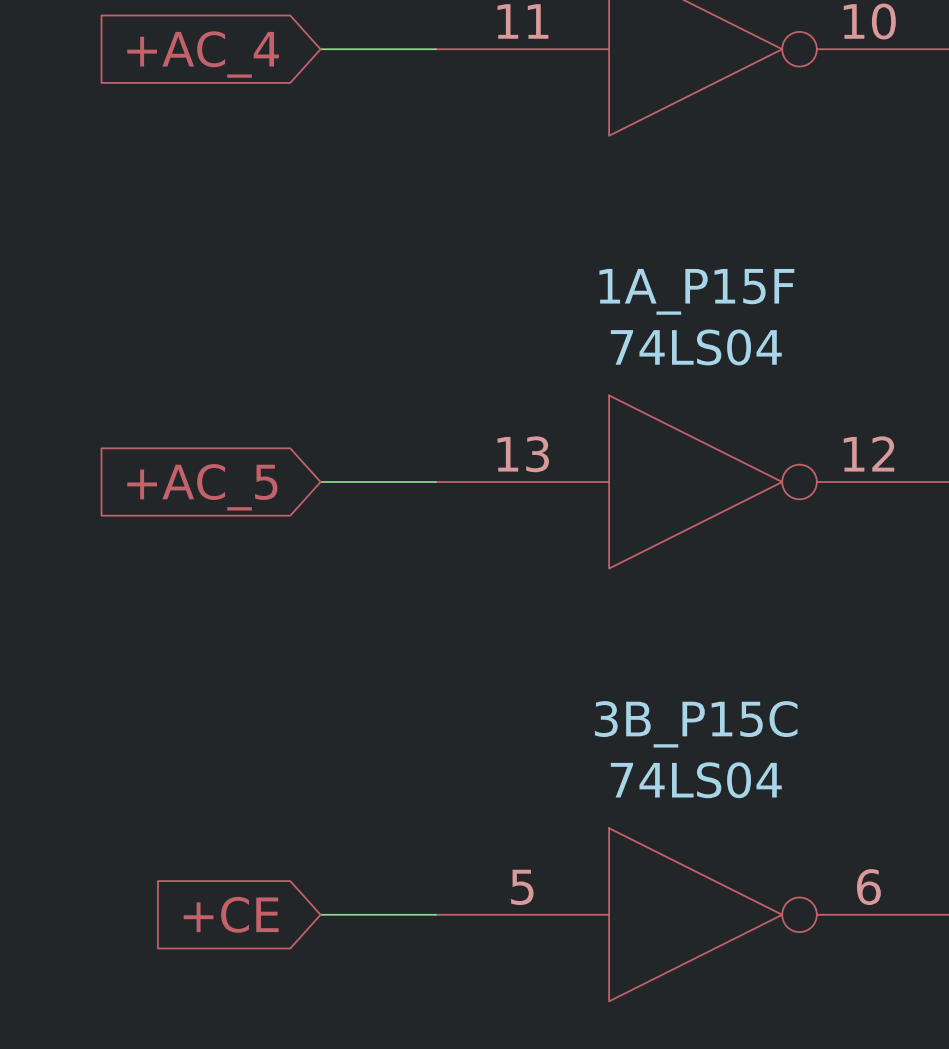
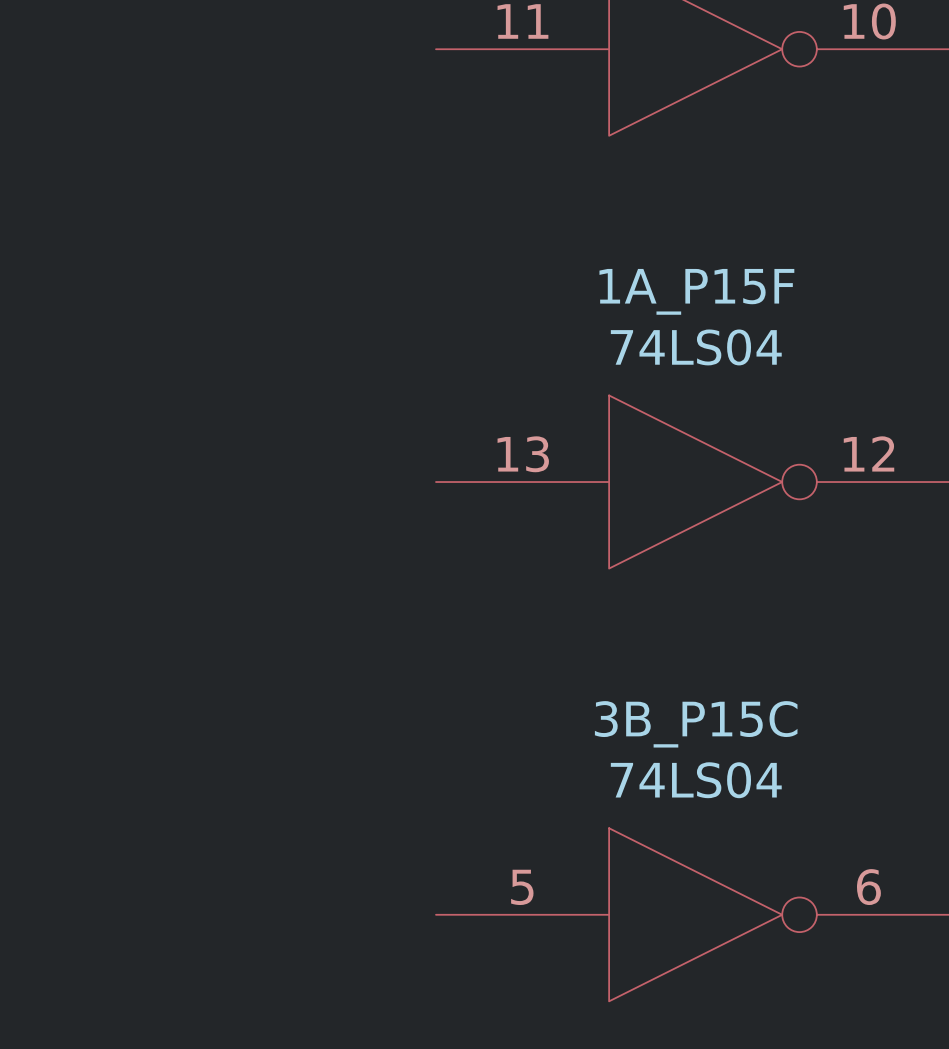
wire: (320, 49) (435, 49) -> none
global label: +AC_4 (203, 54) -> none
wire: (320, 482) (435, 482) -> none
global label: +AC_5 (202, 487) -> none
global label: +CE (231, 914) -> none
wire: (320, 914) (435, 914) -> none

